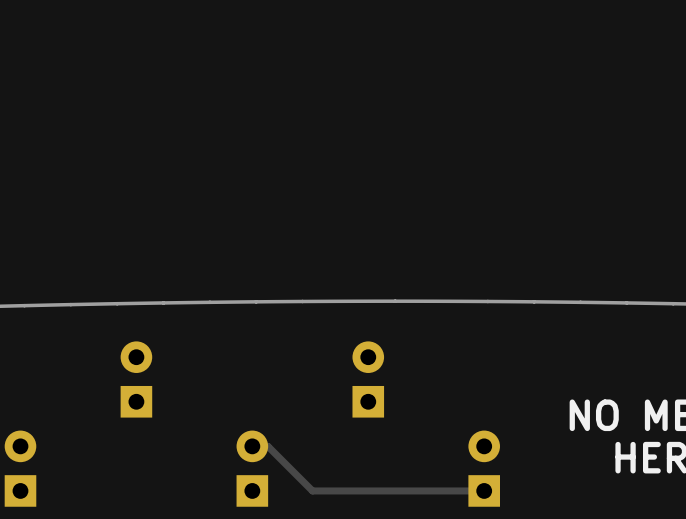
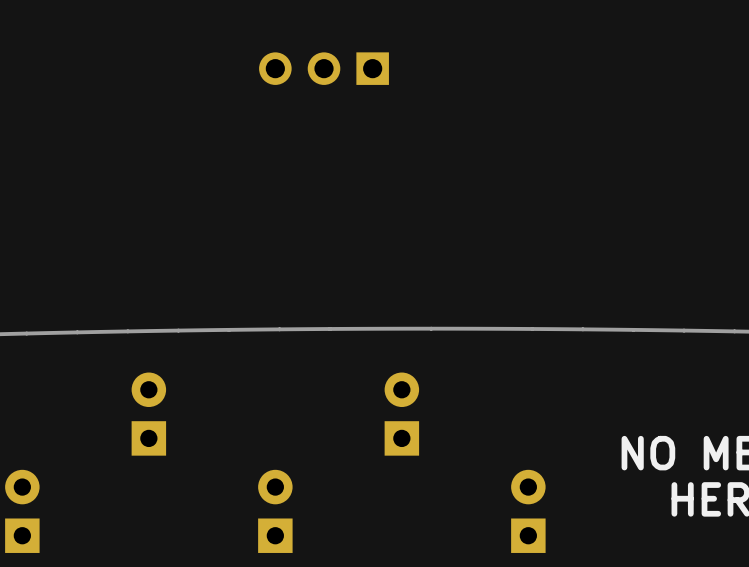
part: none -> (324, 68)
track: (252, 446) (267, 446) (312, 490) (484, 490) -> none

